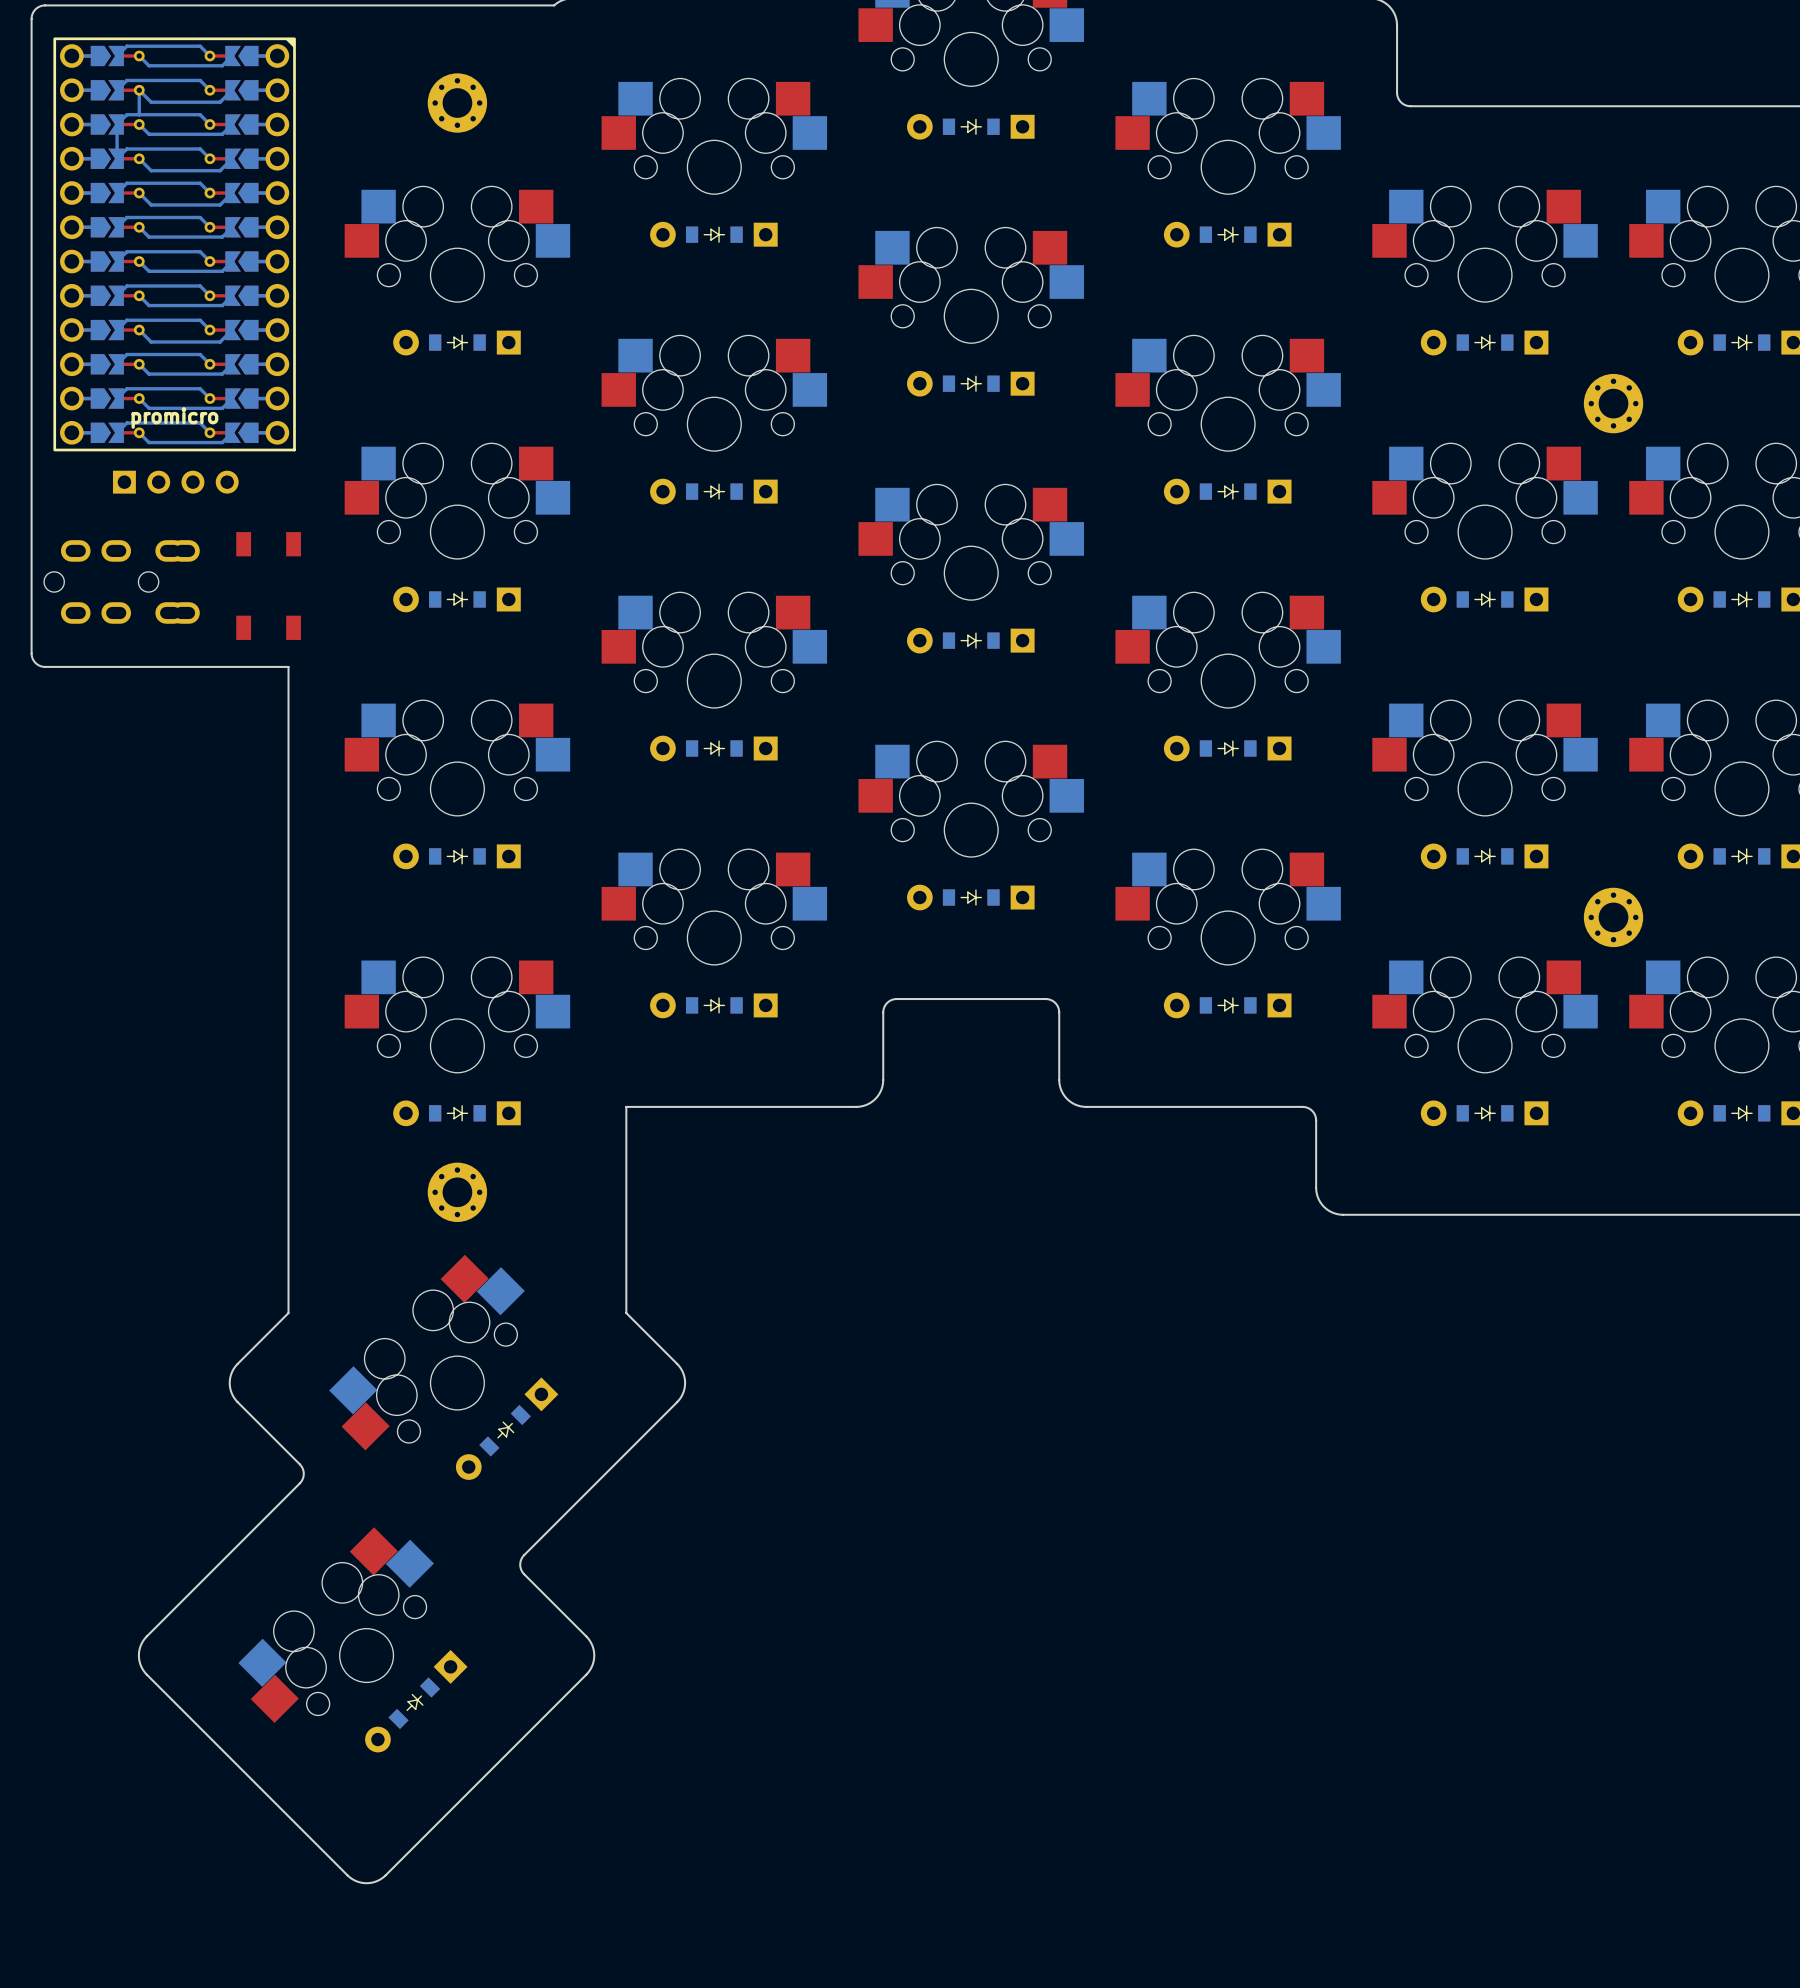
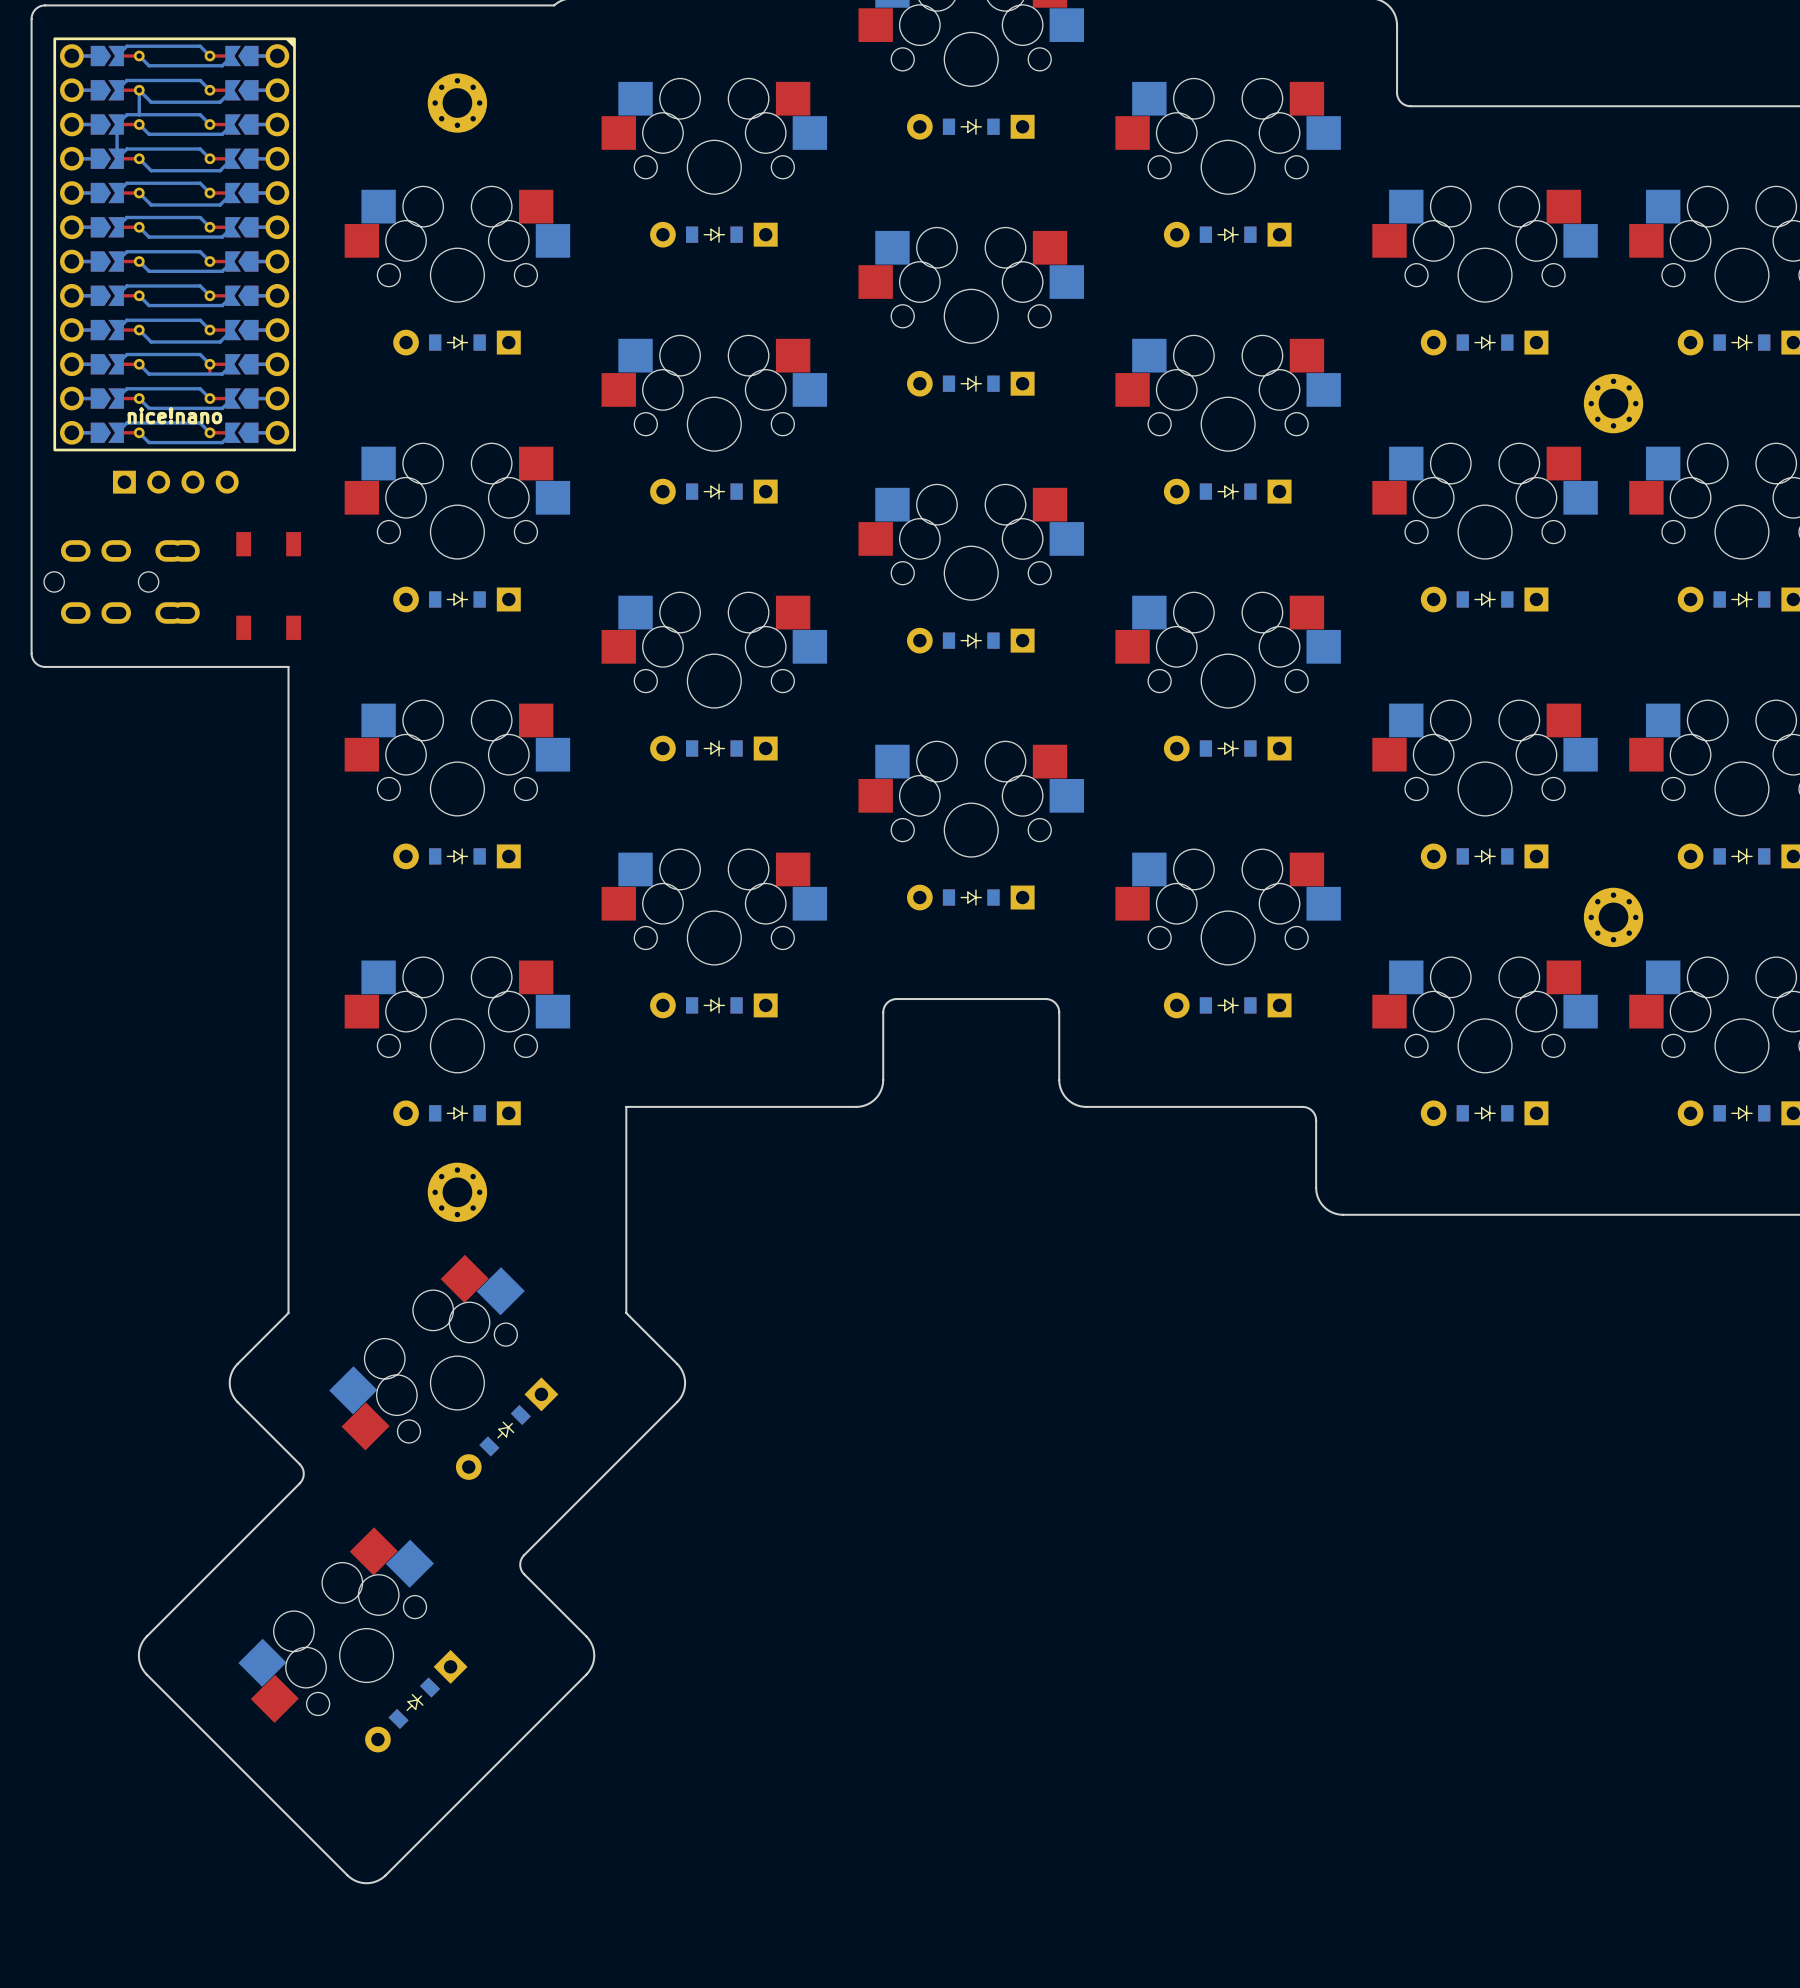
top track: none -> (209, 364) (209, 372)
part text: promicro (174, 418) -> nice!nano (174, 415)

